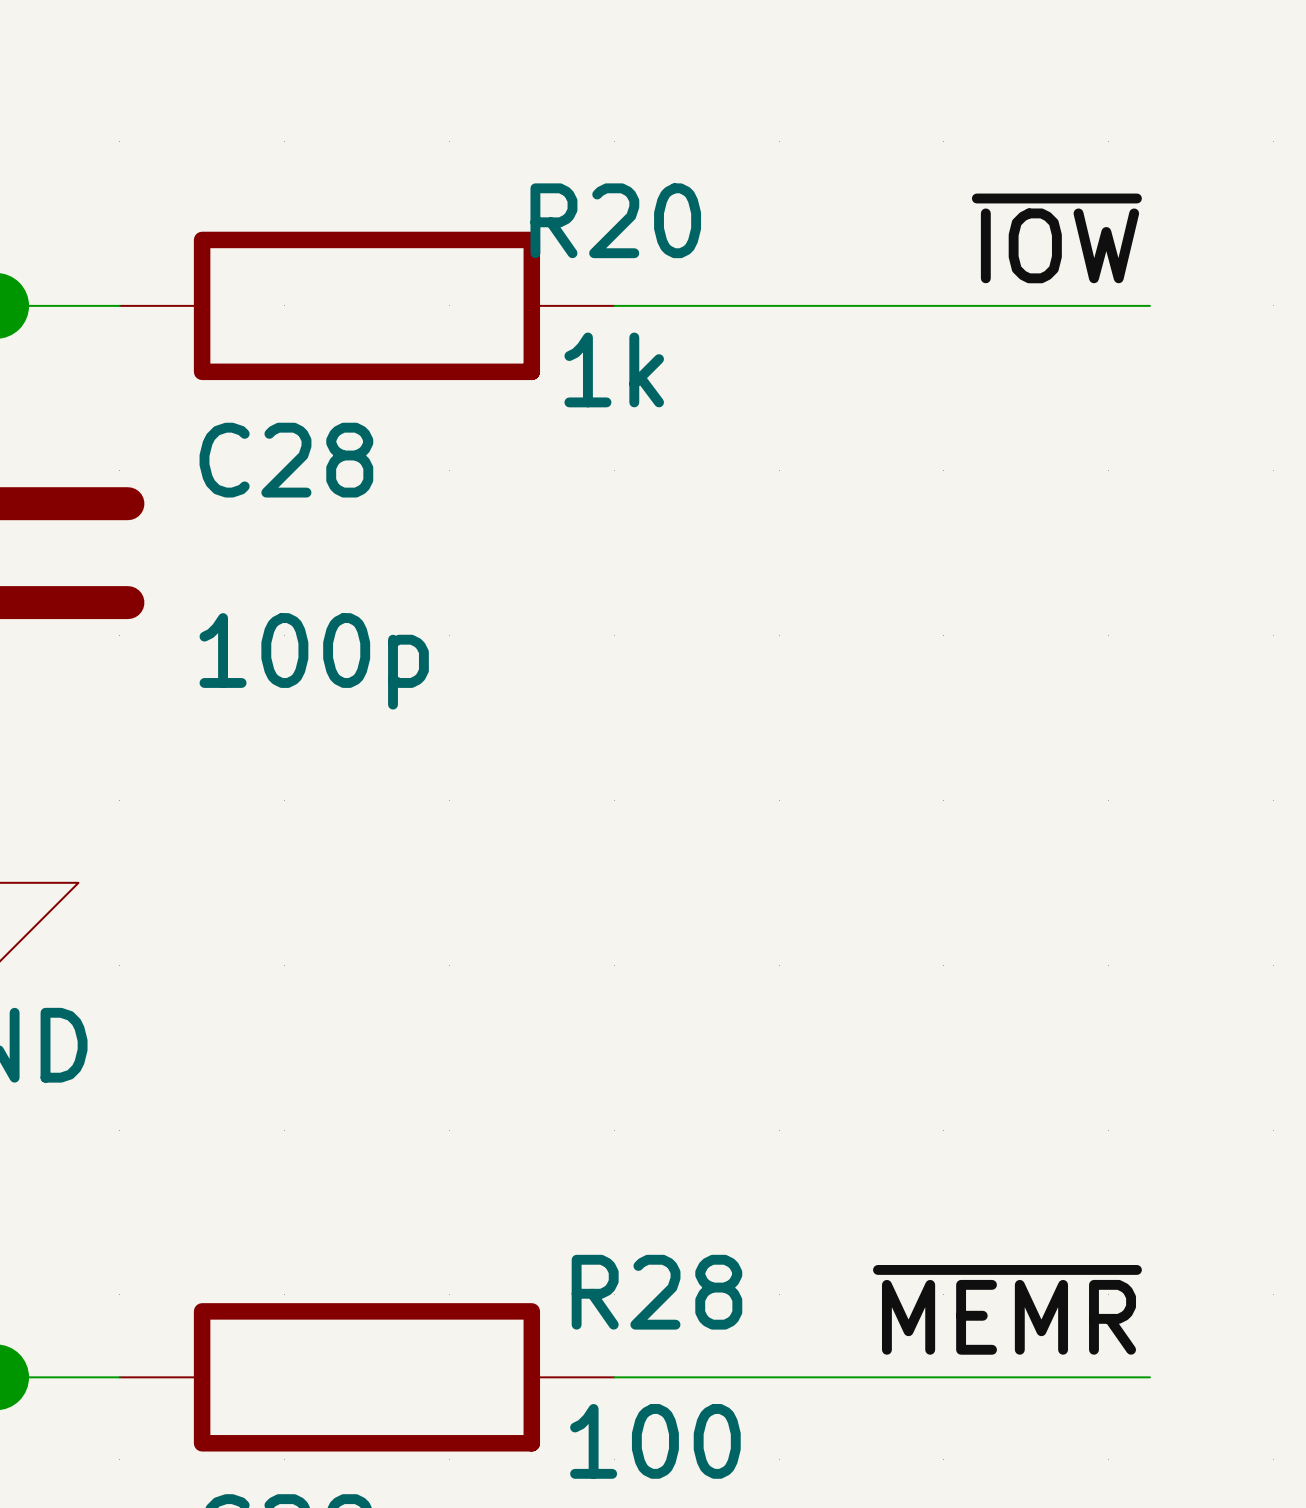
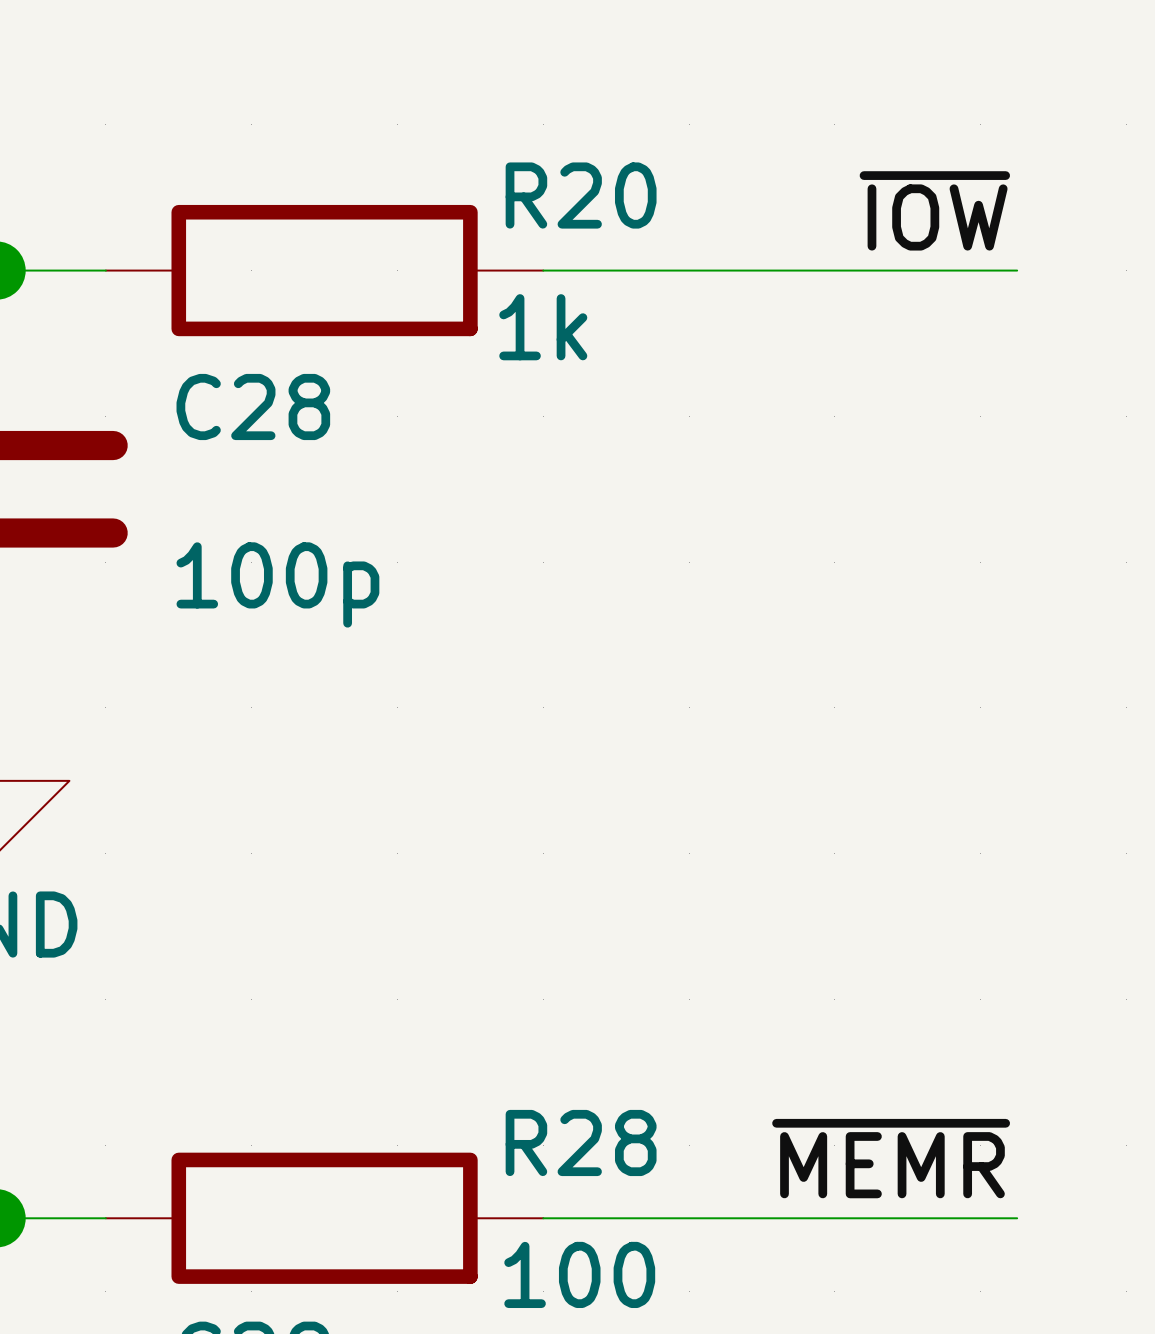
R20 name position: R20 (615, 220) -> R20 (581, 195)

